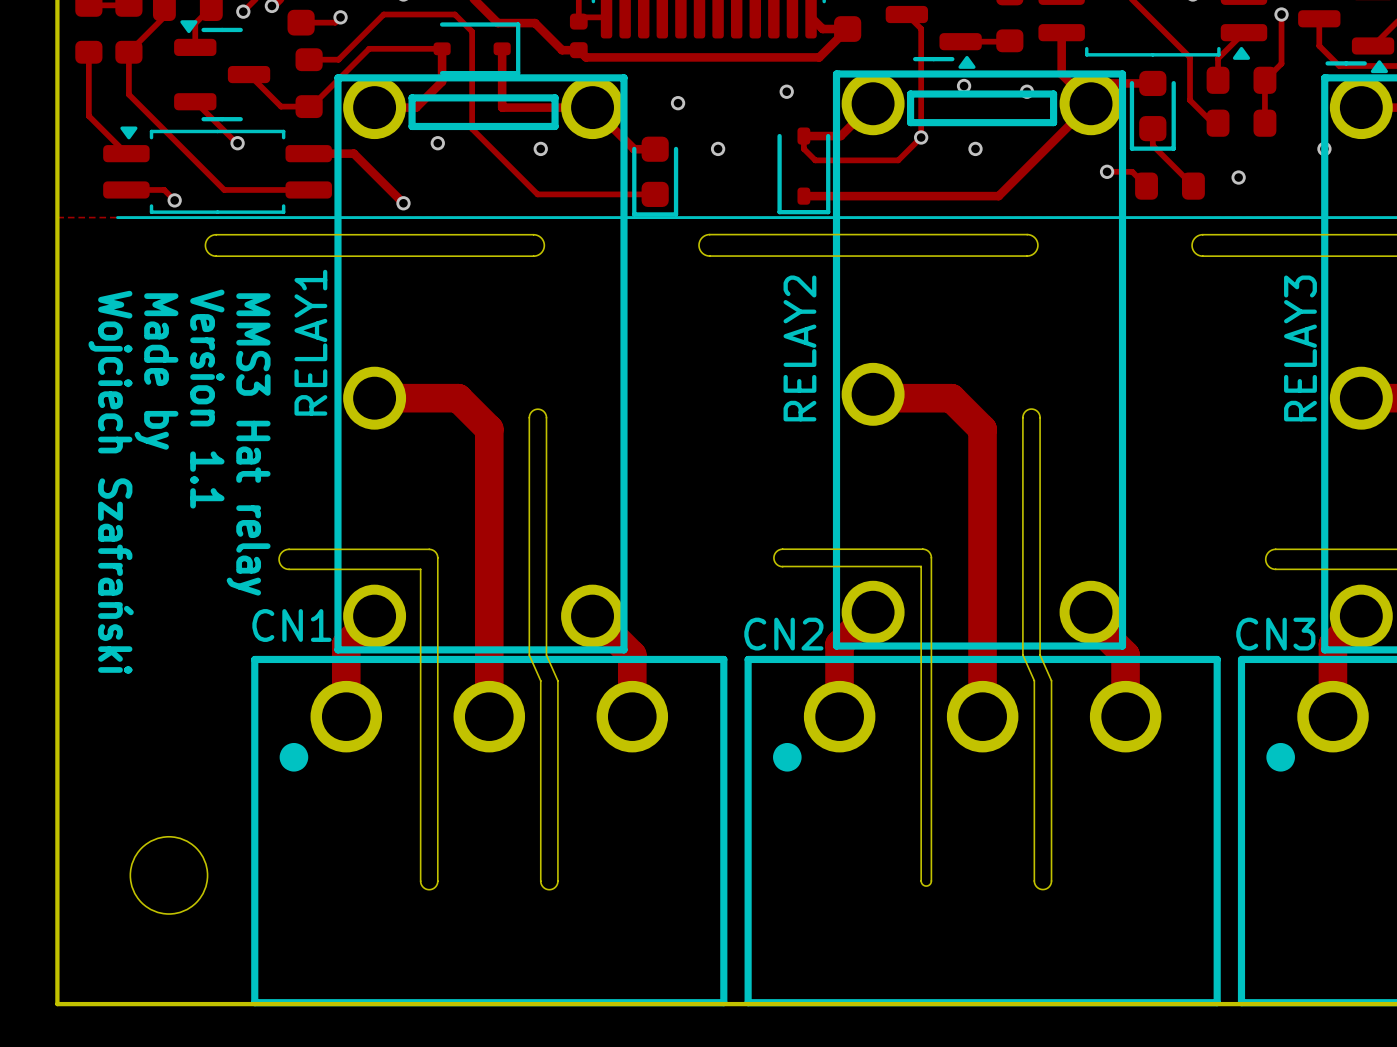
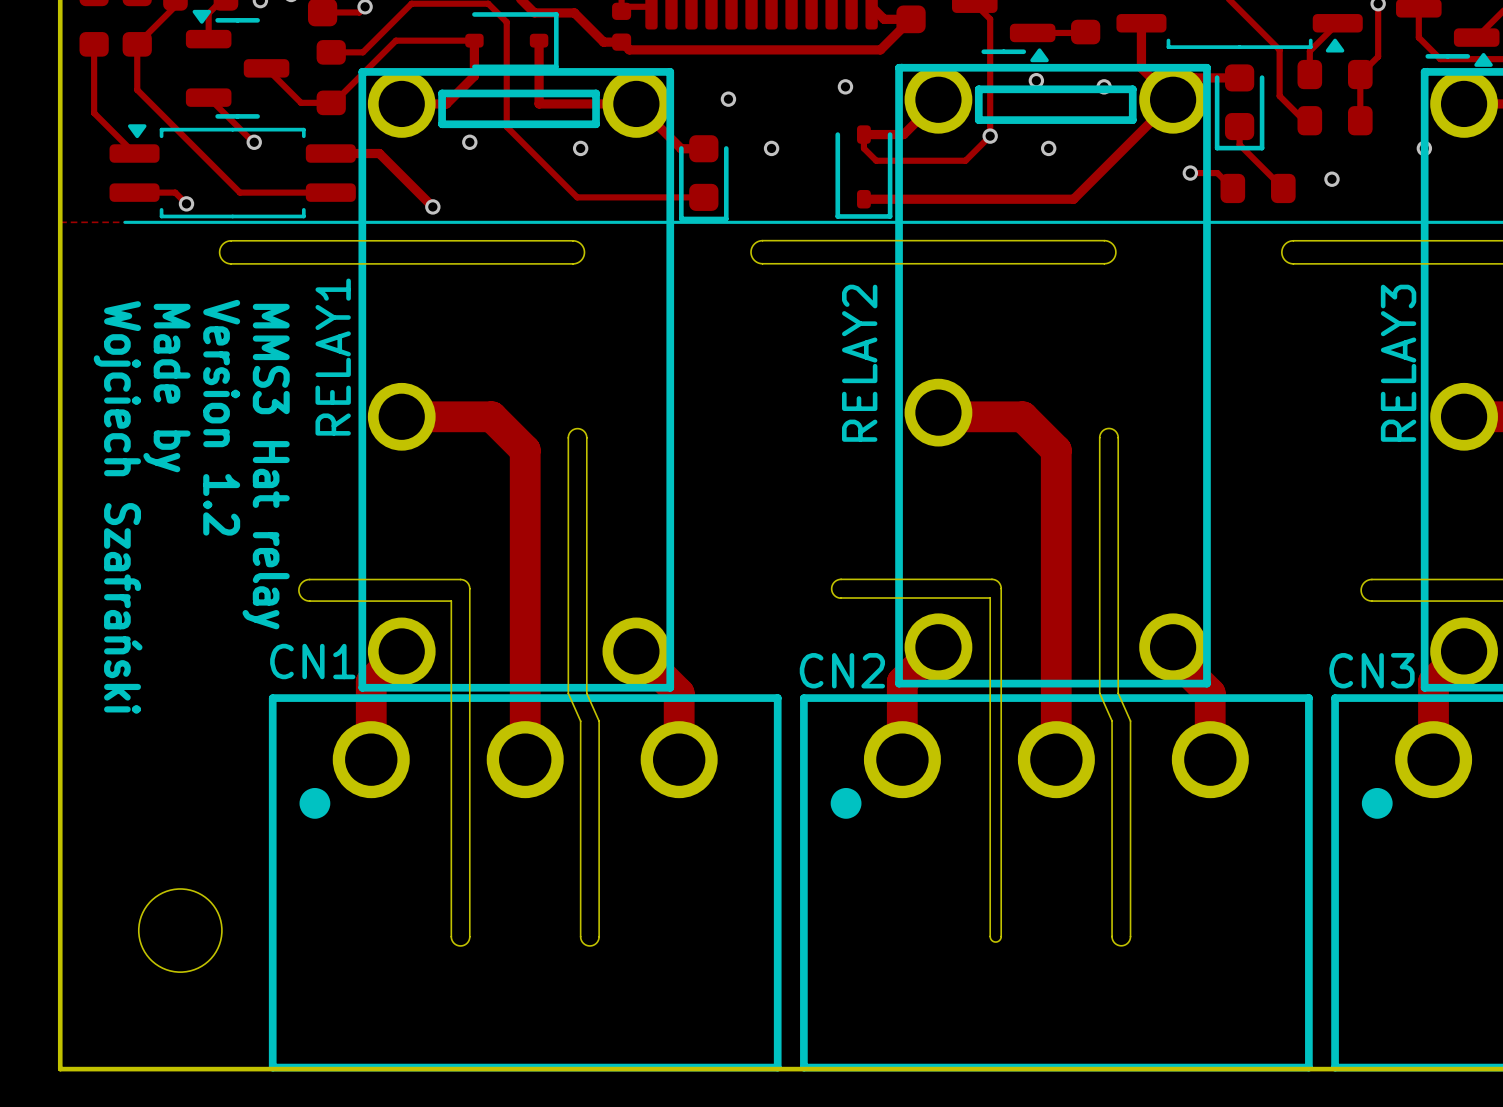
text: Version 1.1 (207, 399) -> Version 1.2 (221, 417)

